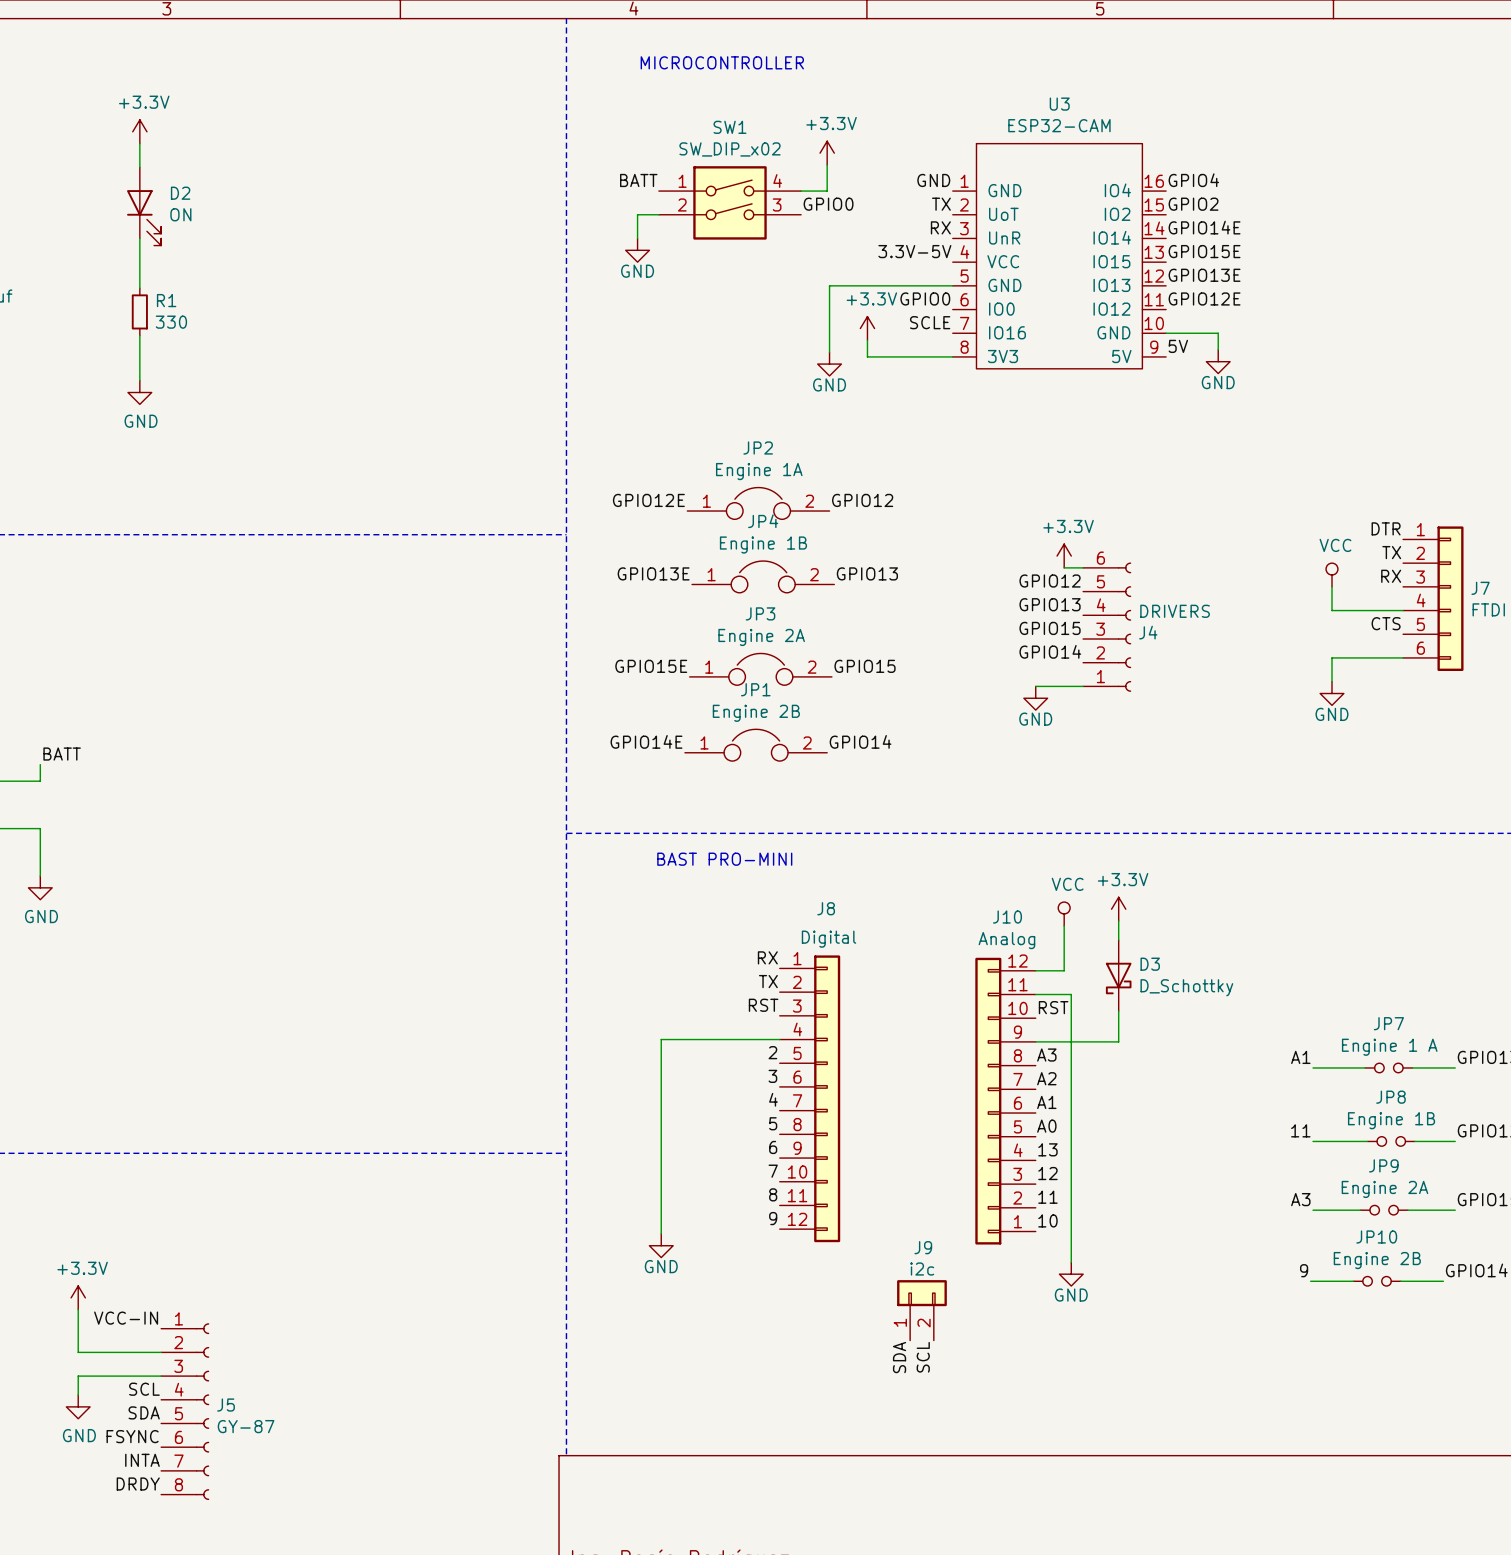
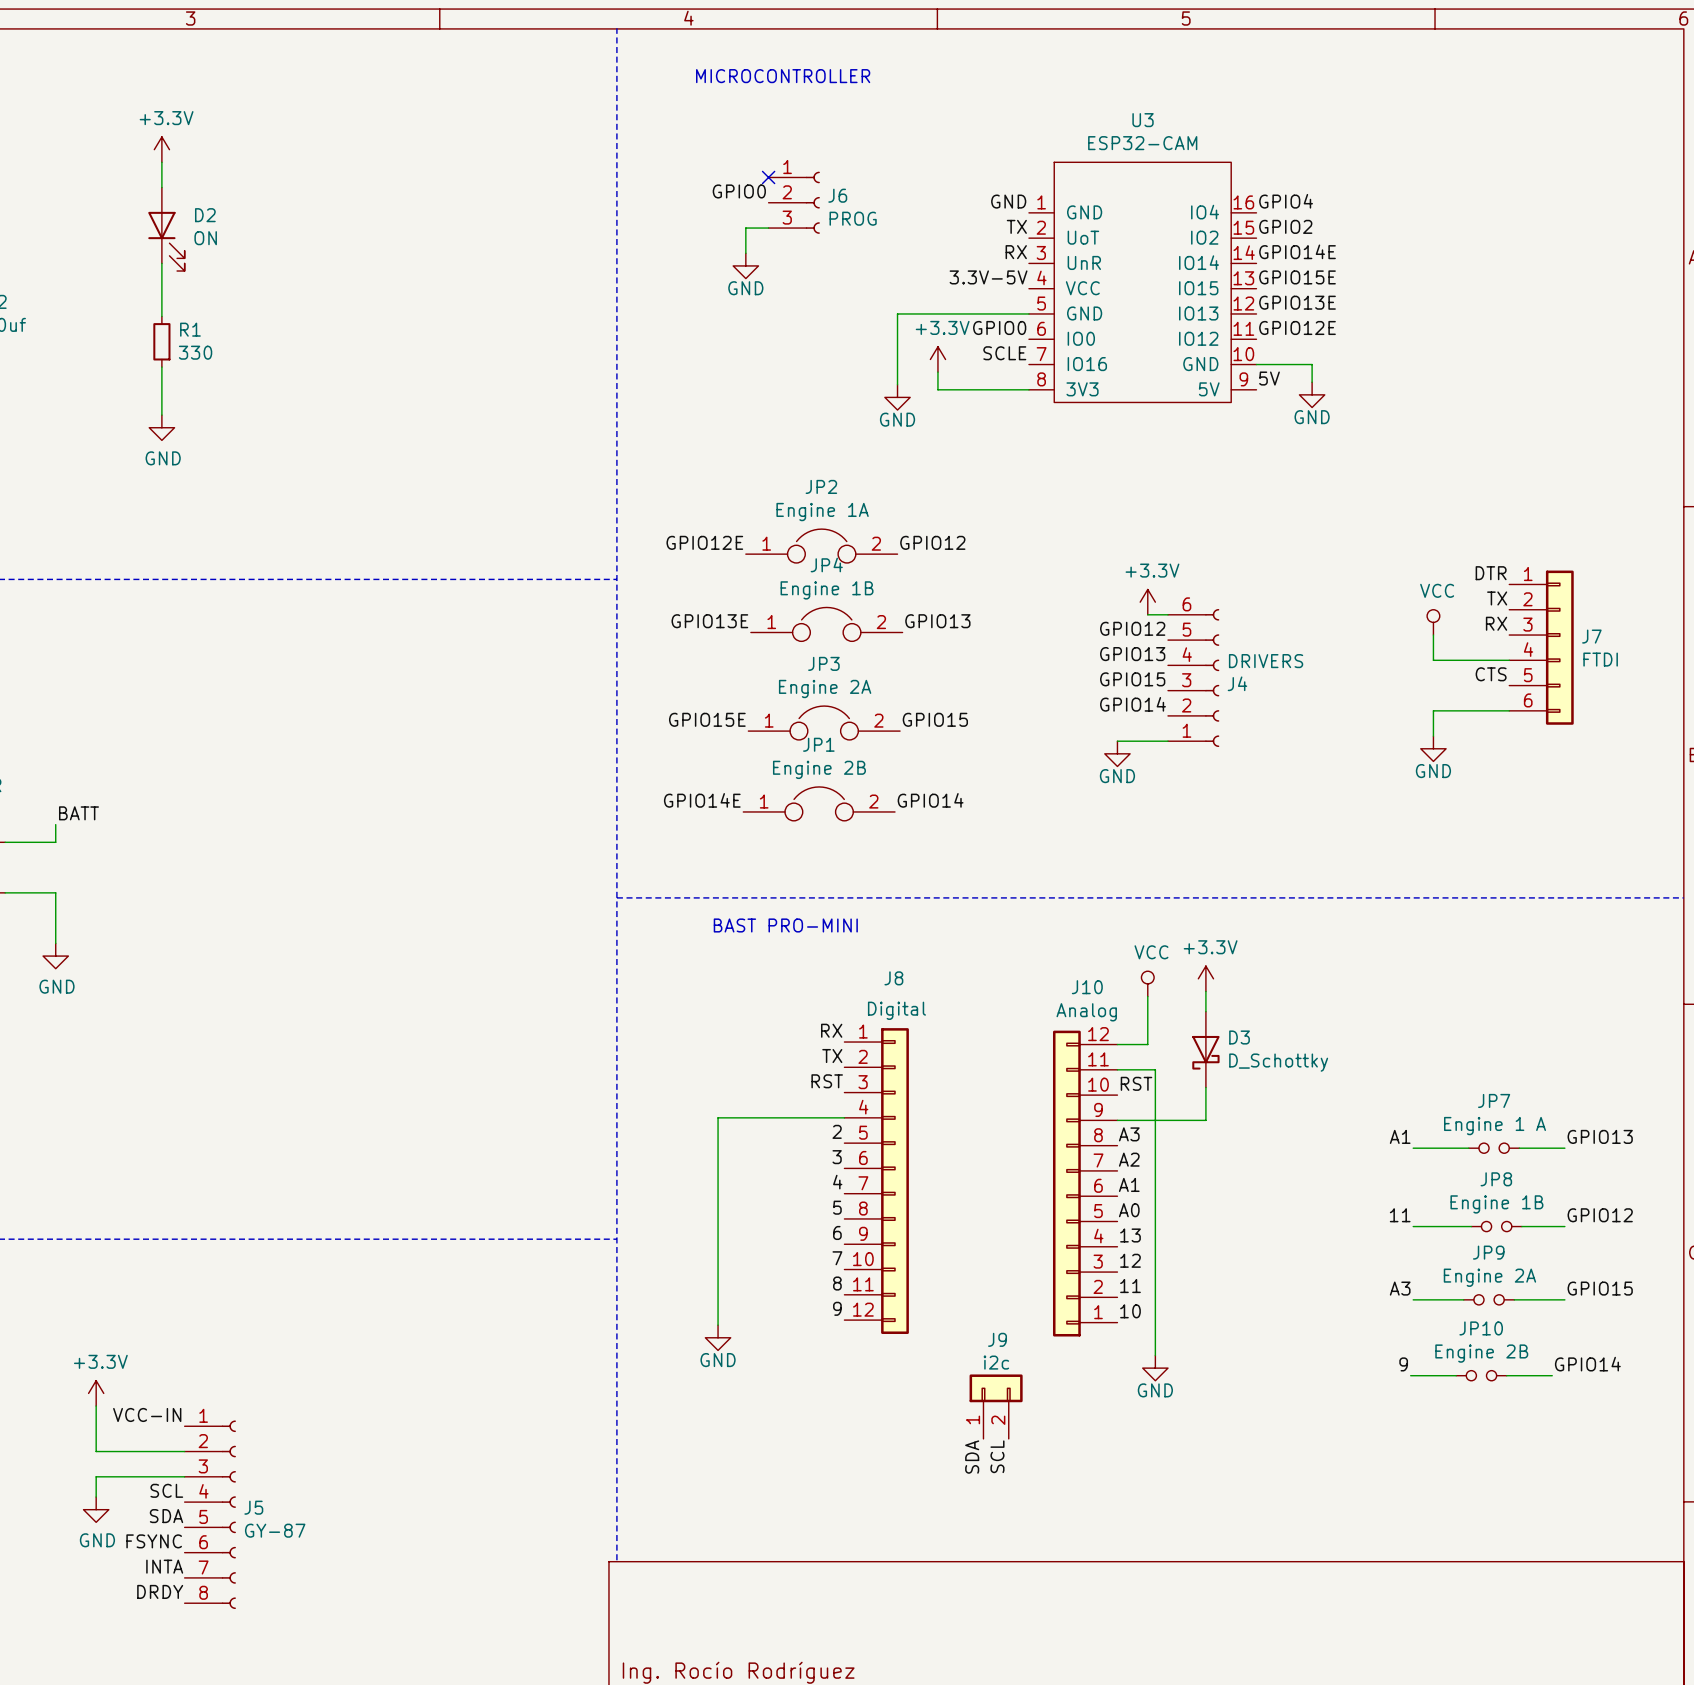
power symbol: +3.3V (827, 153) -> none
no-connect mark: none -> (768, 177)
wire: (827, 164) (827, 191) (801, 191) -> none
label: BATT (638, 180) -> none
J6: none -> PROG (794, 202)
SW1: SW_DIP_x02 (729, 202) -> none
label position: GPIO0 (828, 204) -> GPIO0 (739, 191)
wire: (658, 214) (637, 214) (637, 238) -> (768, 228) (745, 228) (745, 253)
power symbol position: GND (637, 250) -> GND (745, 265)

